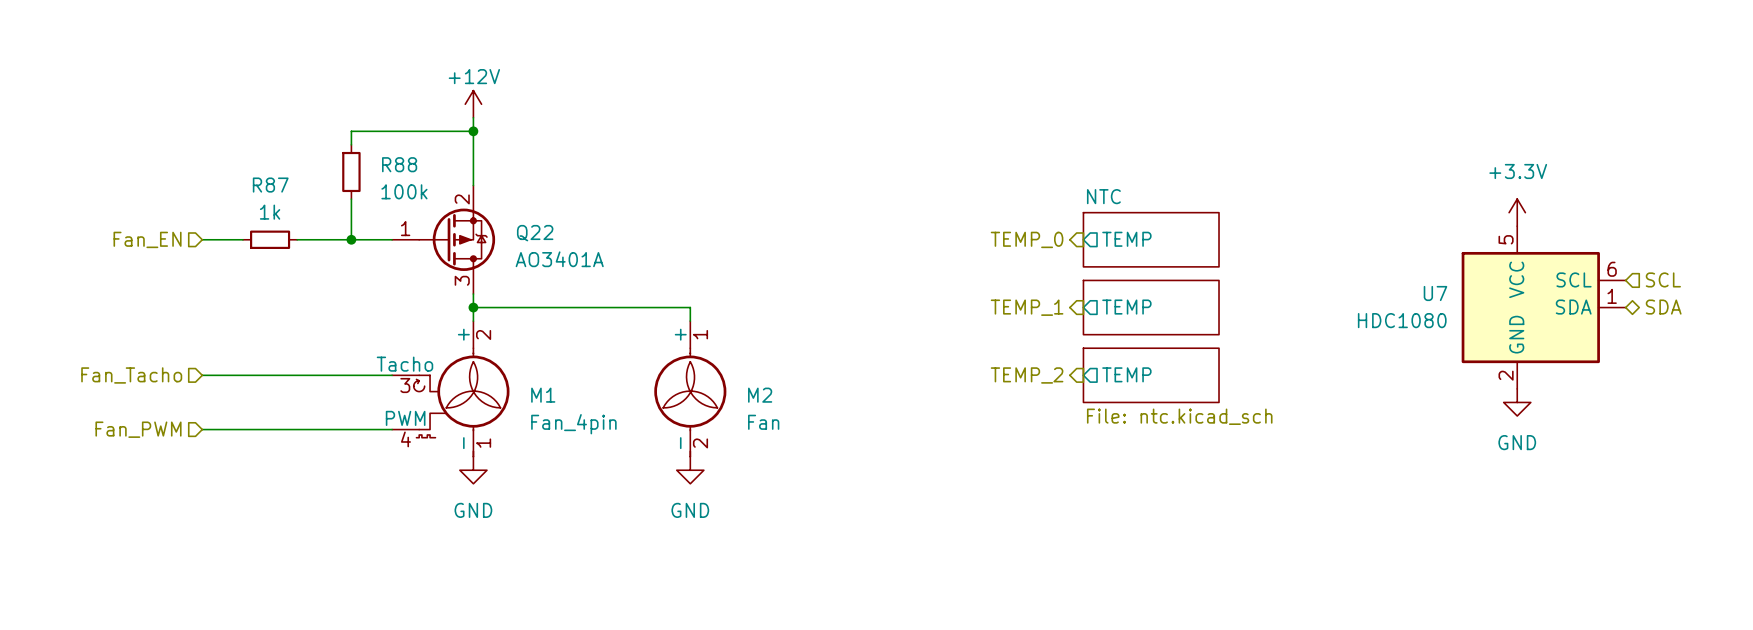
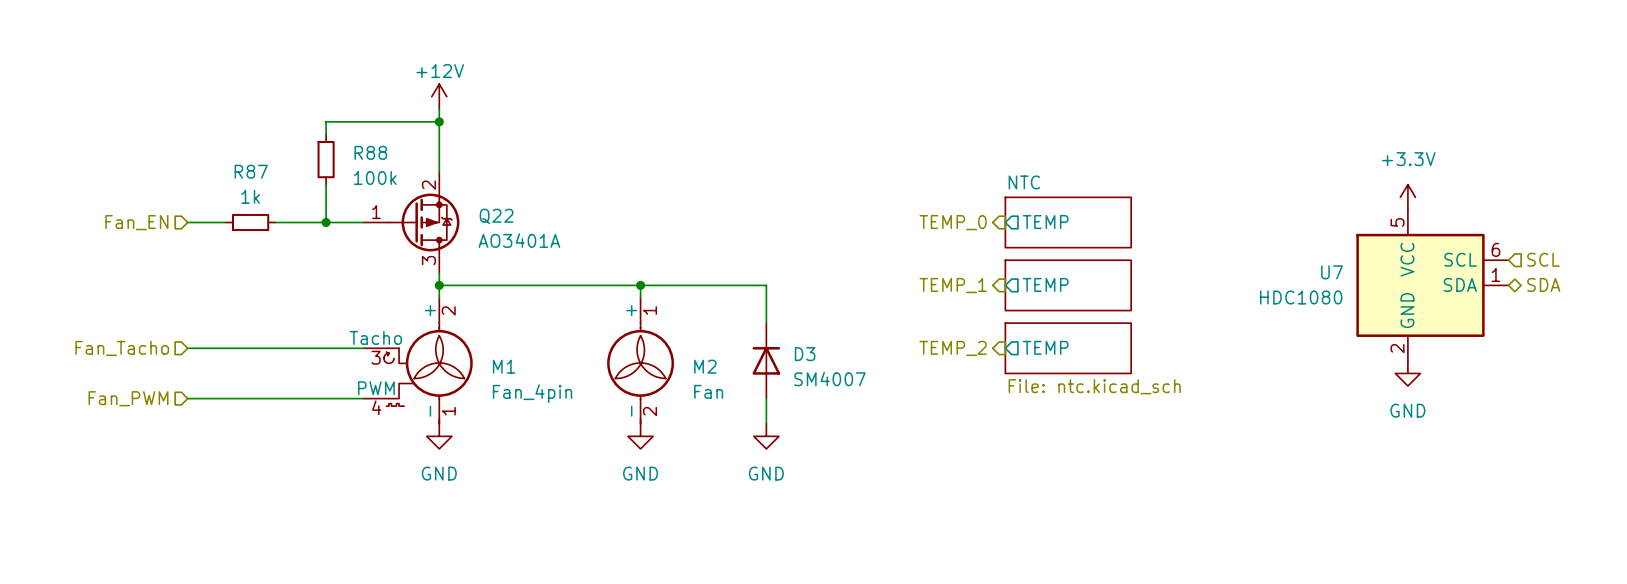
wire: none -> (640, 285) (766, 285) (766, 323)
junction: none -> (640, 285)
D3: none -> SM4007 (766, 360)
wire: none -> (766, 398) (766, 423)
power symbol: none -> GND (766, 436)

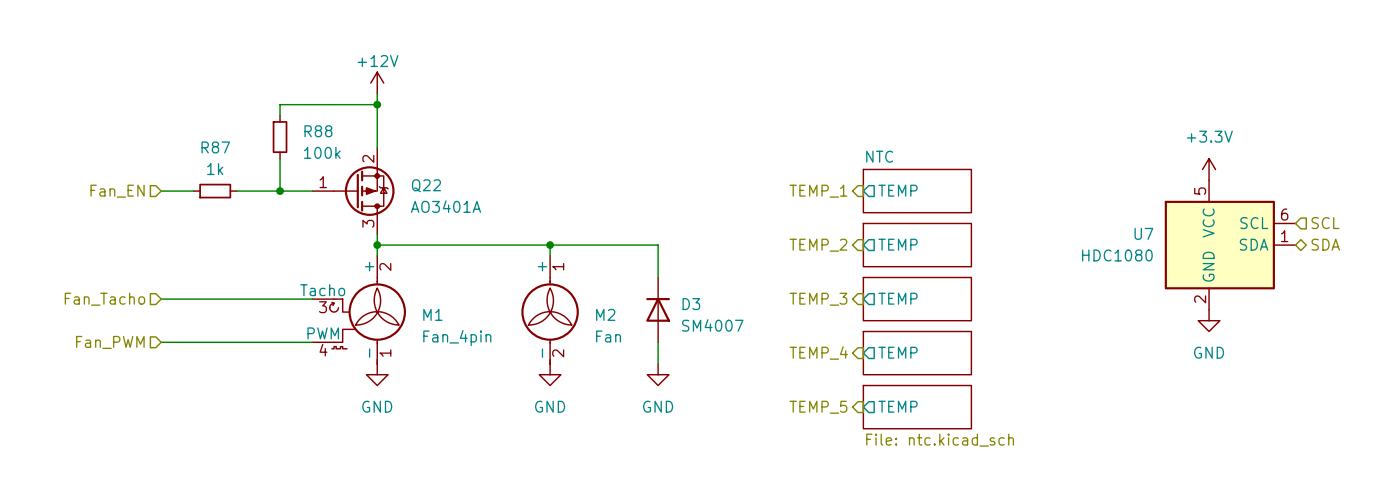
hierarchical label: TEMP_0 (953, 222) -> TEMP_1 (818, 191)
hierarchical label: TEMP_1 (953, 285) -> TEMP_2 (818, 245)
hierarchical label: TEMP_2 (953, 348) -> TEMP_3 (818, 299)
sheet value: File: ntc.kicad_sch (1094, 386) -> none
sheet pin: none -> TEMP (898, 352)
hierarchical label: none -> TEMP_4 (818, 352)
sheet: none -> (917, 353)
sheet pin: none -> TEMP (898, 406)
hierarchical label: none -> TEMP_5 (818, 407)
sheet: none -> File: ntc.kicad_sch (917, 407)

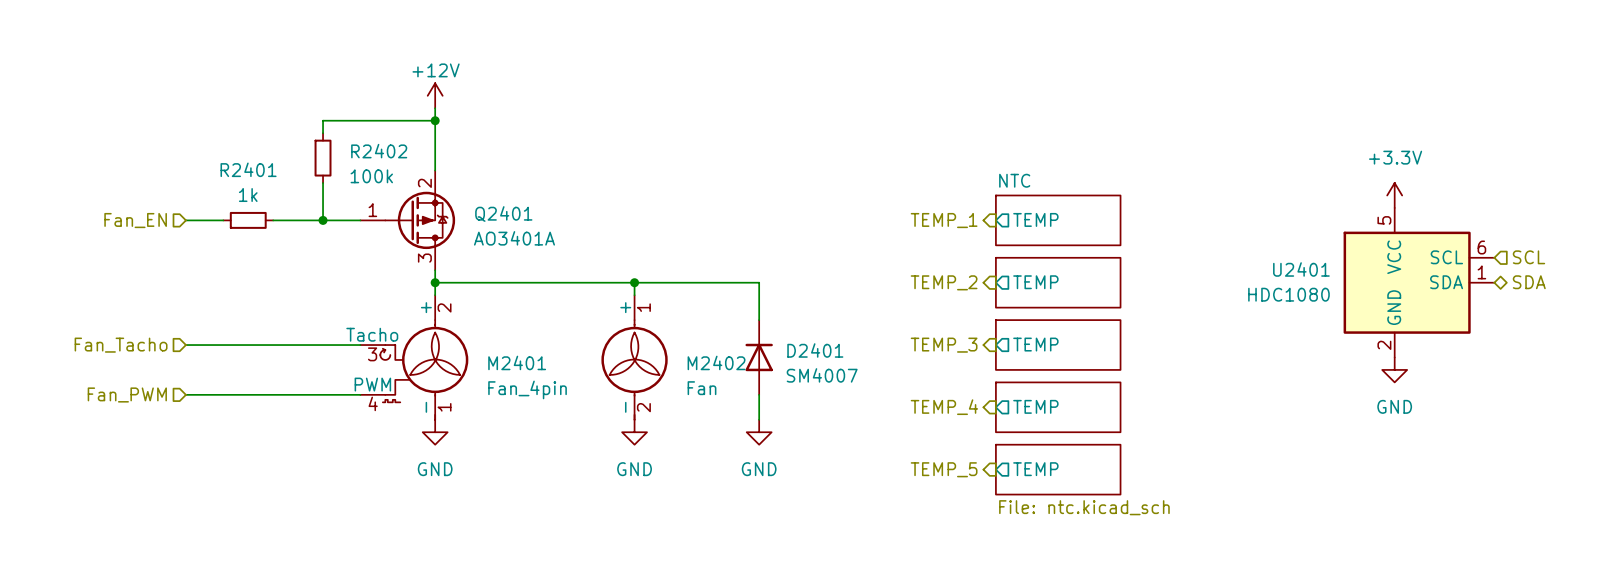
R88 name: R88 (318, 131) -> R2402 (379, 151)
R87 name: R87 (215, 147) -> R2401 (248, 169)
Q22 name: Q22 (426, 185) -> Q2401 (503, 214)
U7 name: U7 (1143, 233) -> U2401 (1301, 269)
D3 name: D3 (691, 304) -> D2401 (815, 350)
M1 name: M1 (432, 314) -> M2401 (517, 362)
M2 name: M2 (605, 314) -> M2402 (716, 362)

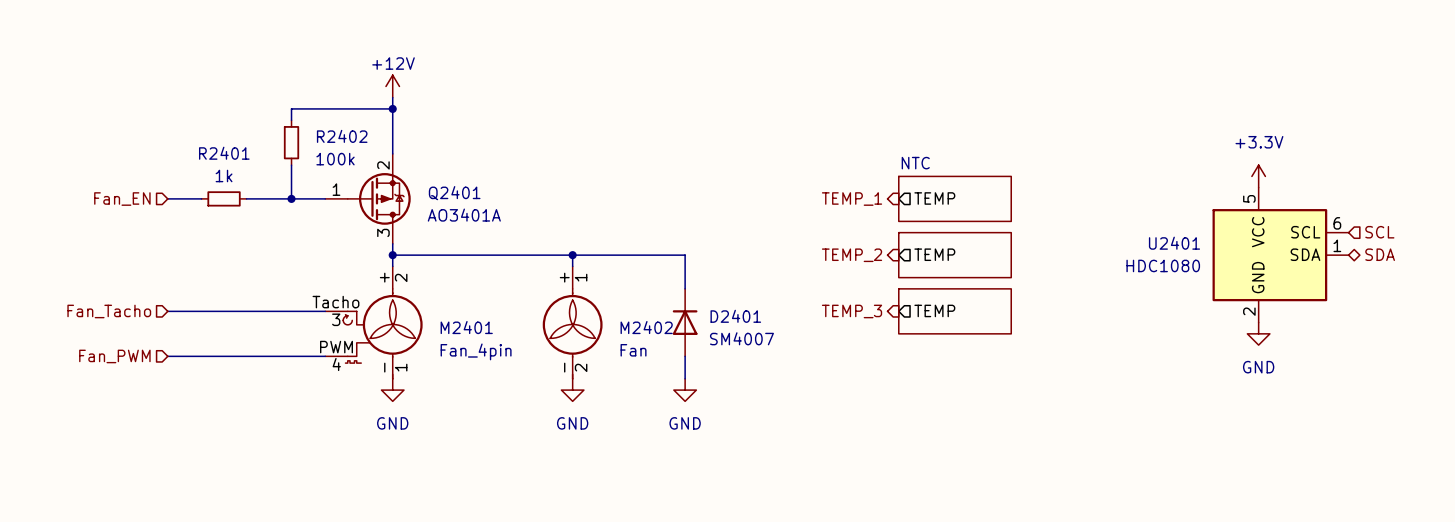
sheet pin: TEMP (1035, 406) -> none
hierarchical label: TEMP_4 (944, 407) -> none
sheet: (1058, 407) -> none
hierarchical label: TEMP_5 (944, 469) -> none
sheet pin: TEMP (1035, 469) -> none
sheet: File: ntc.kicad_sch (1058, 469) -> none

